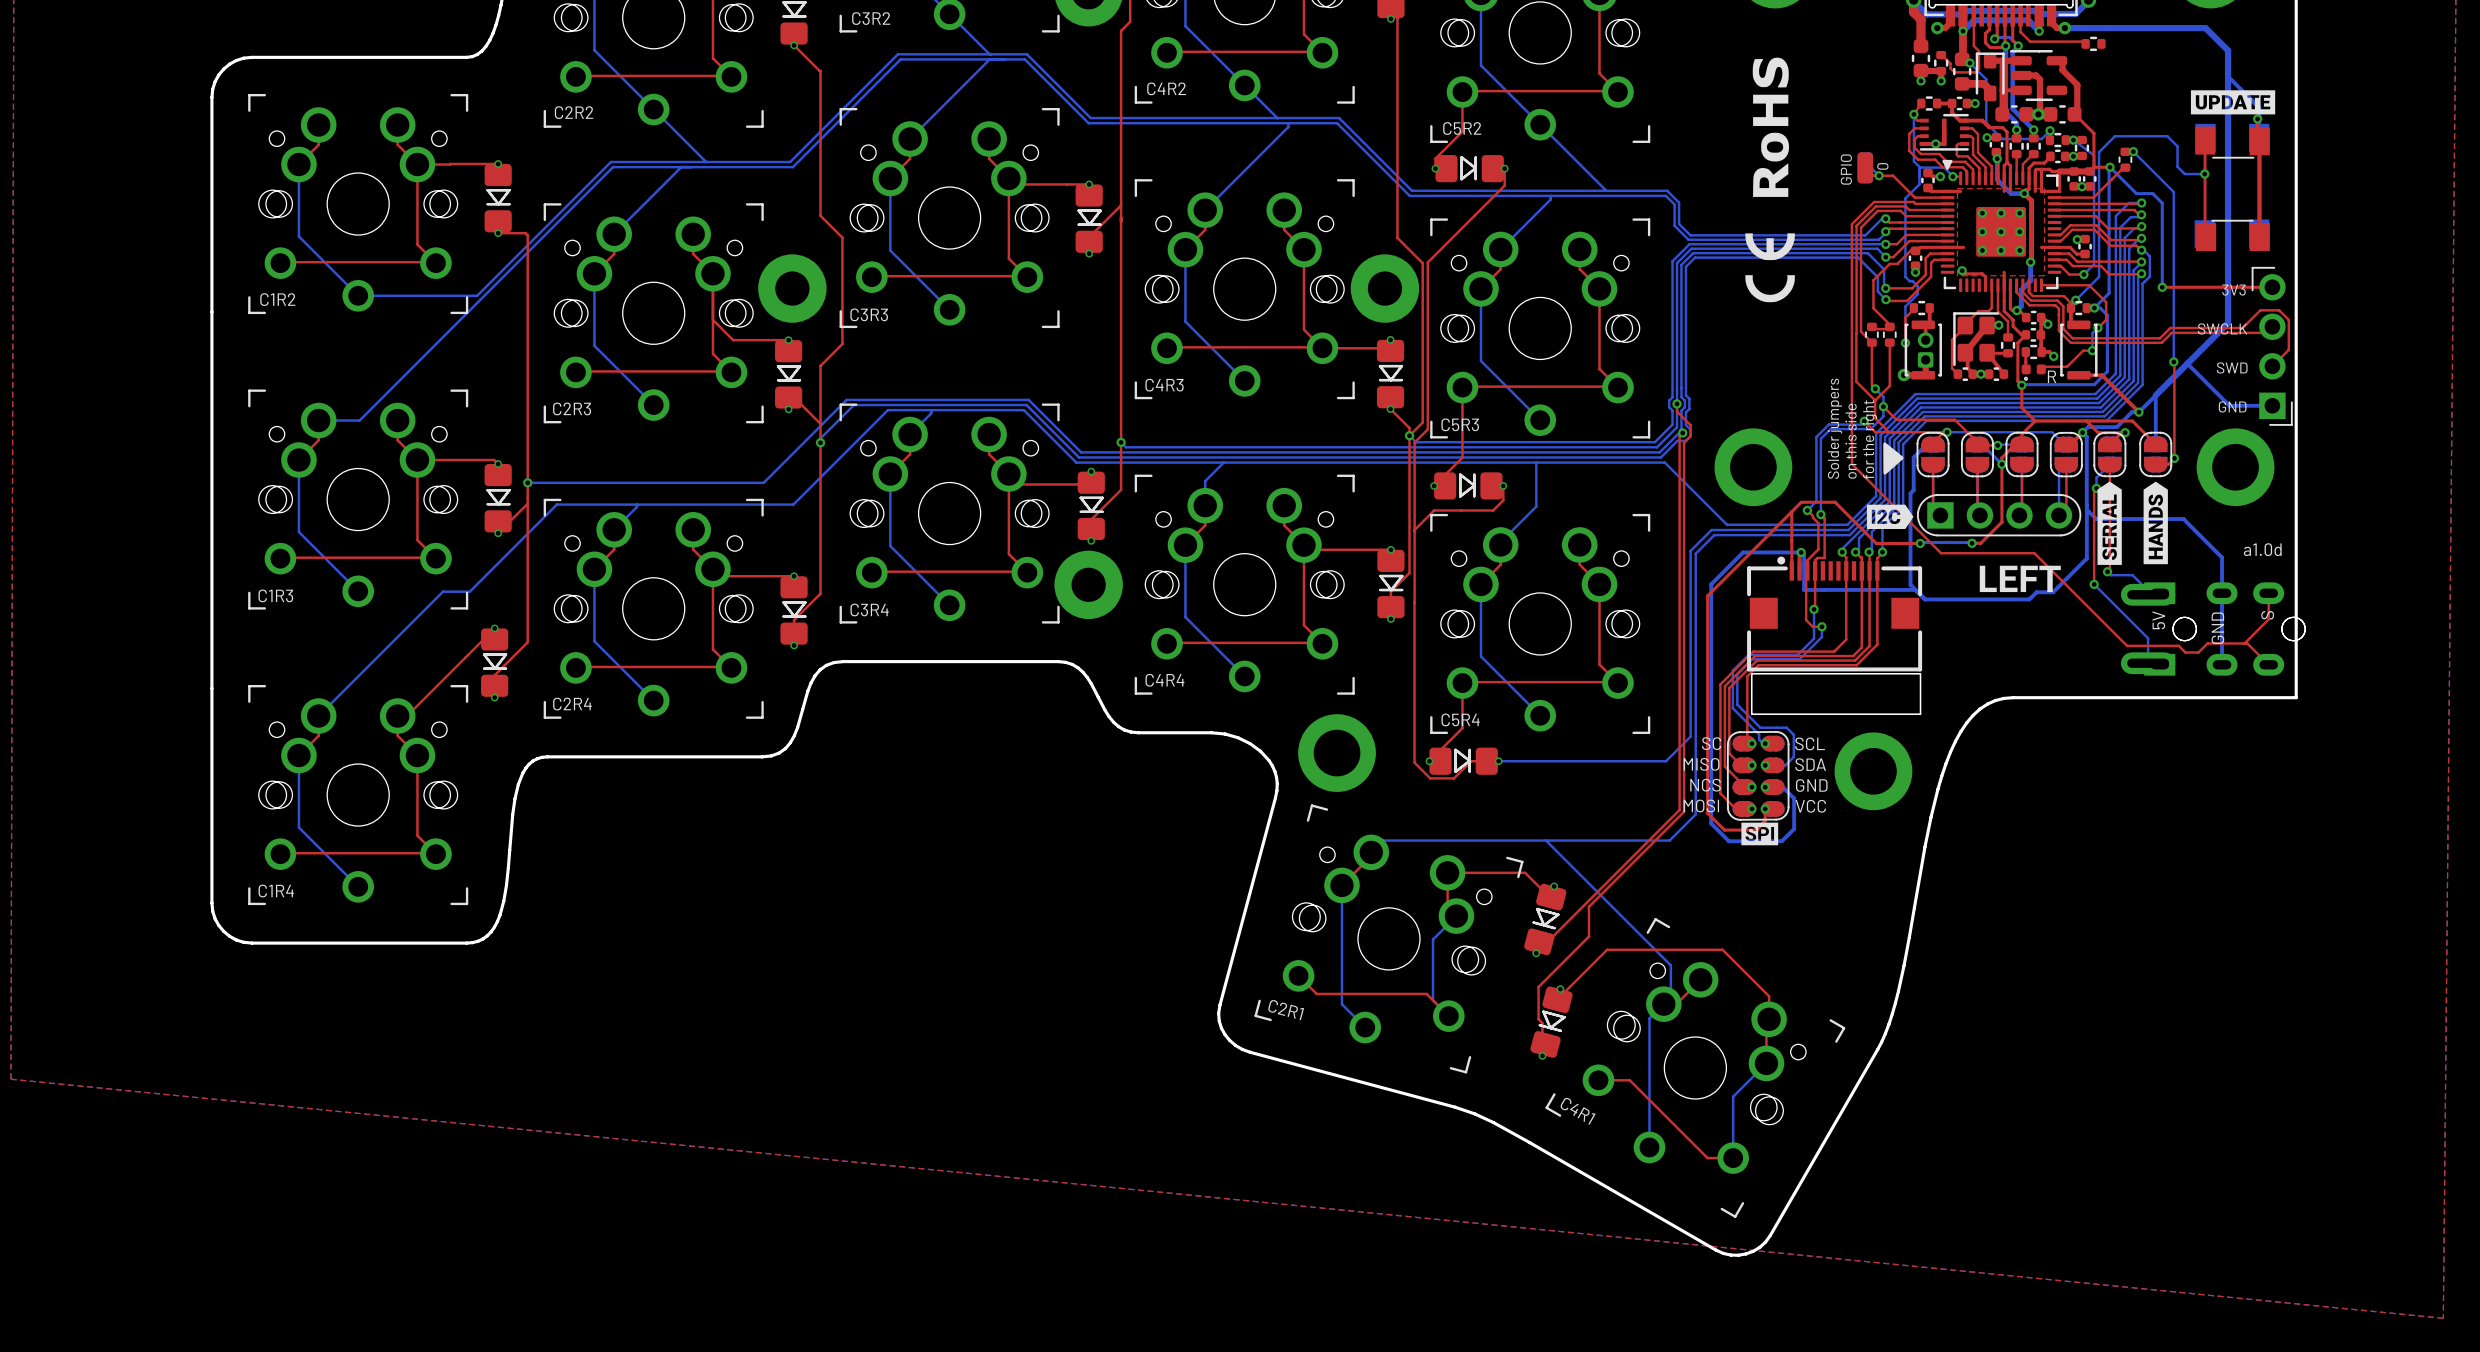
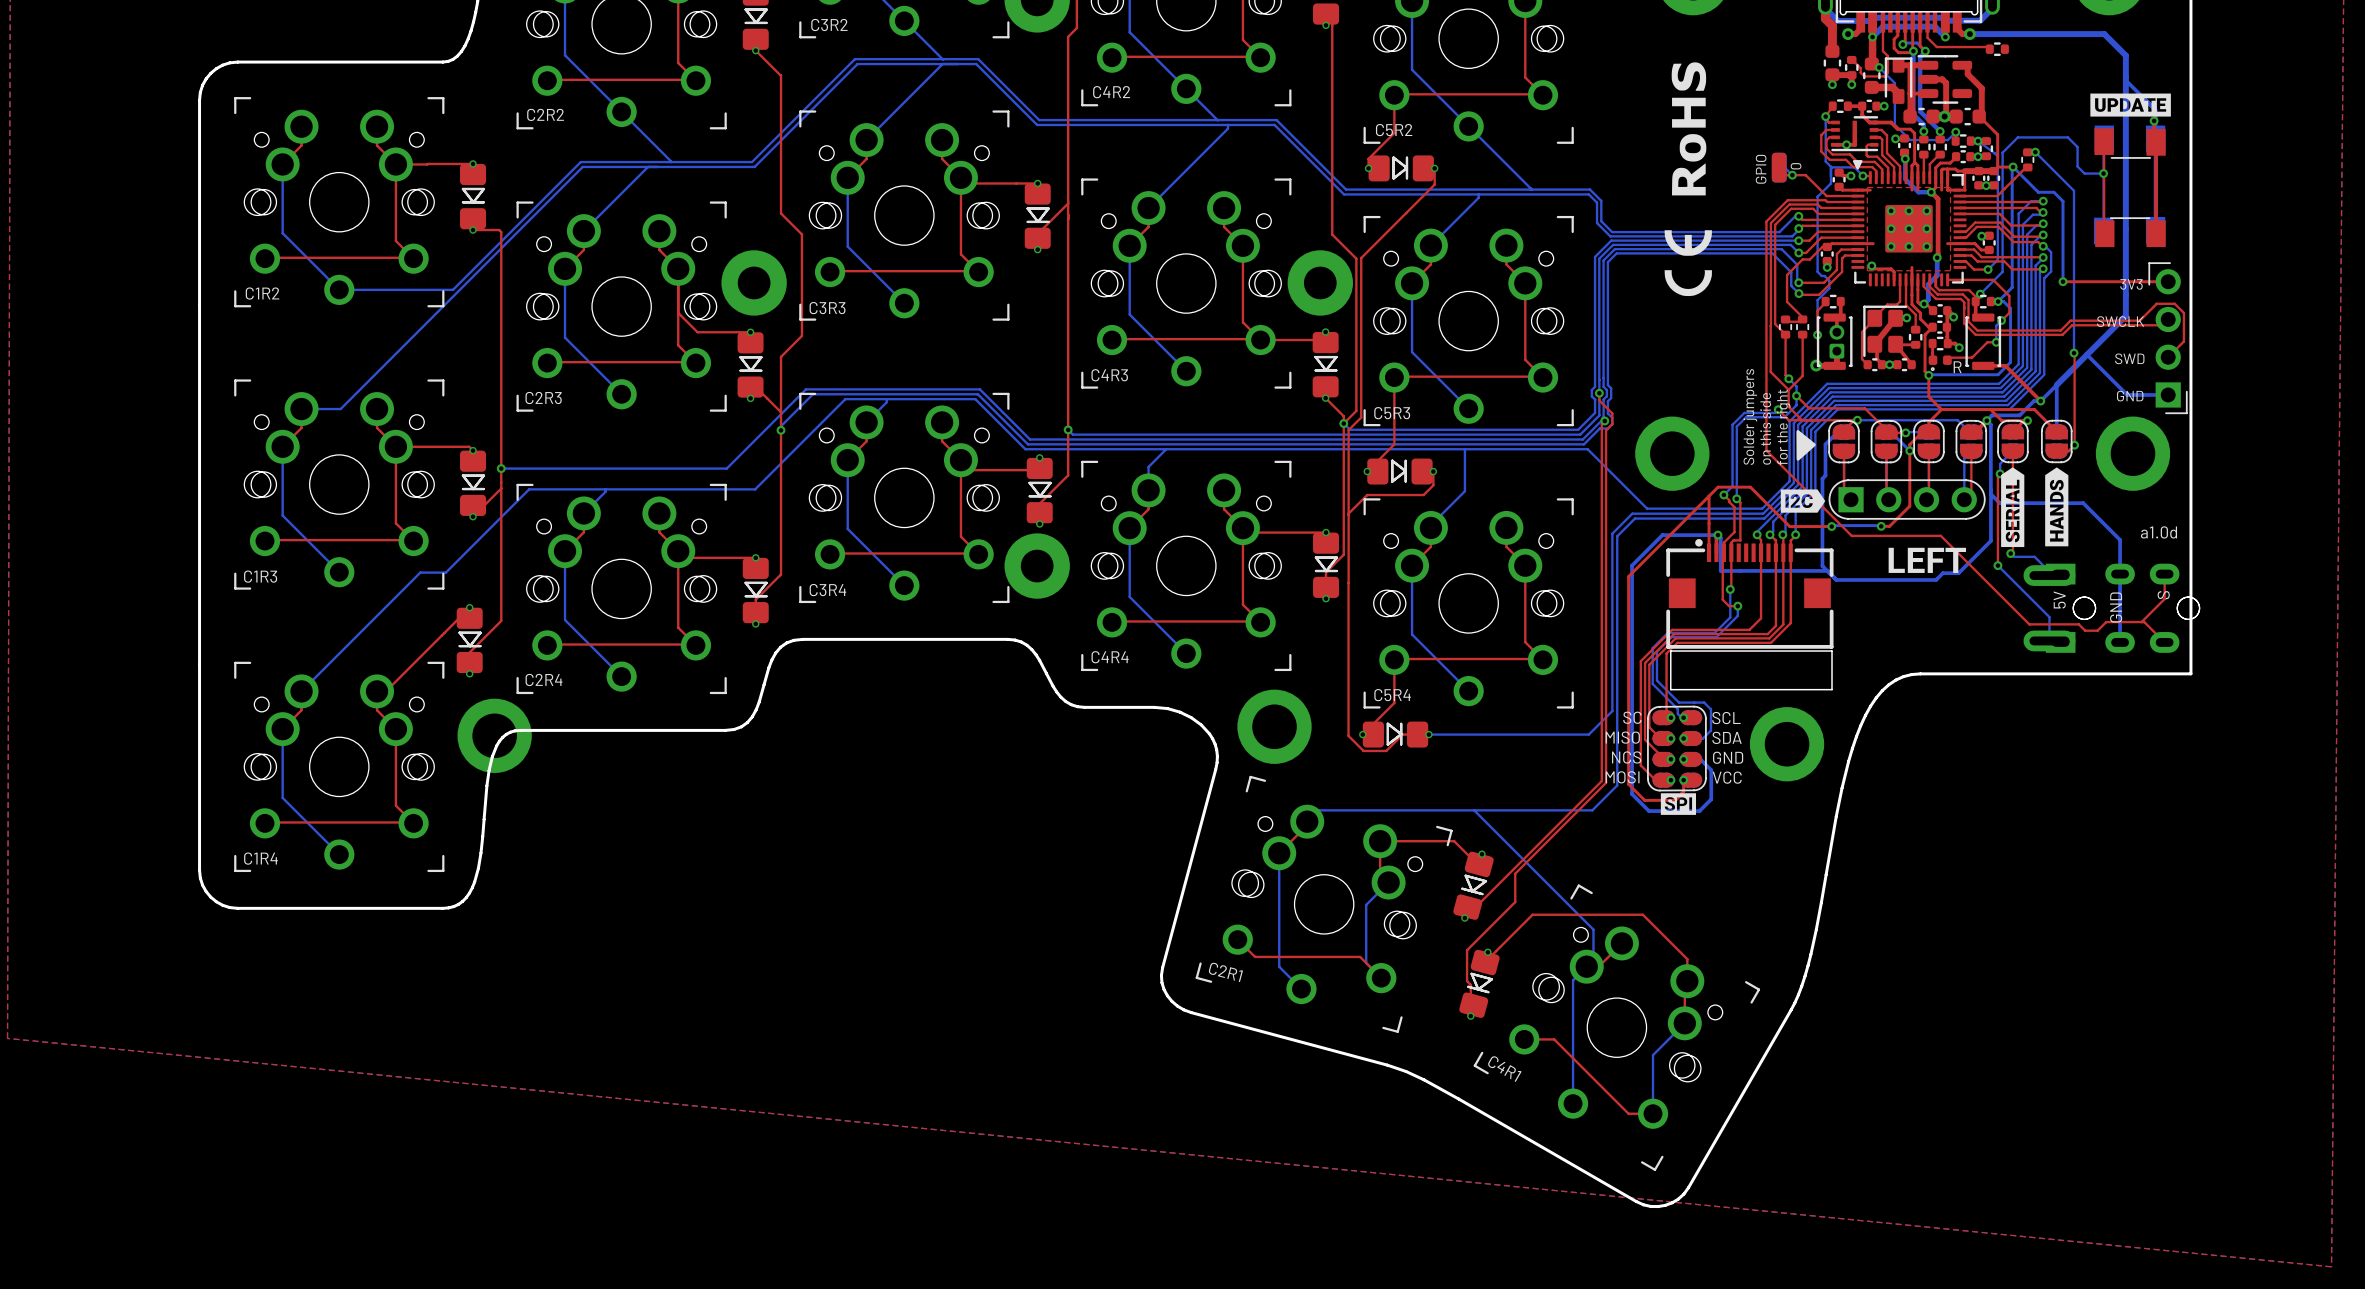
part: none -> (494, 735)

